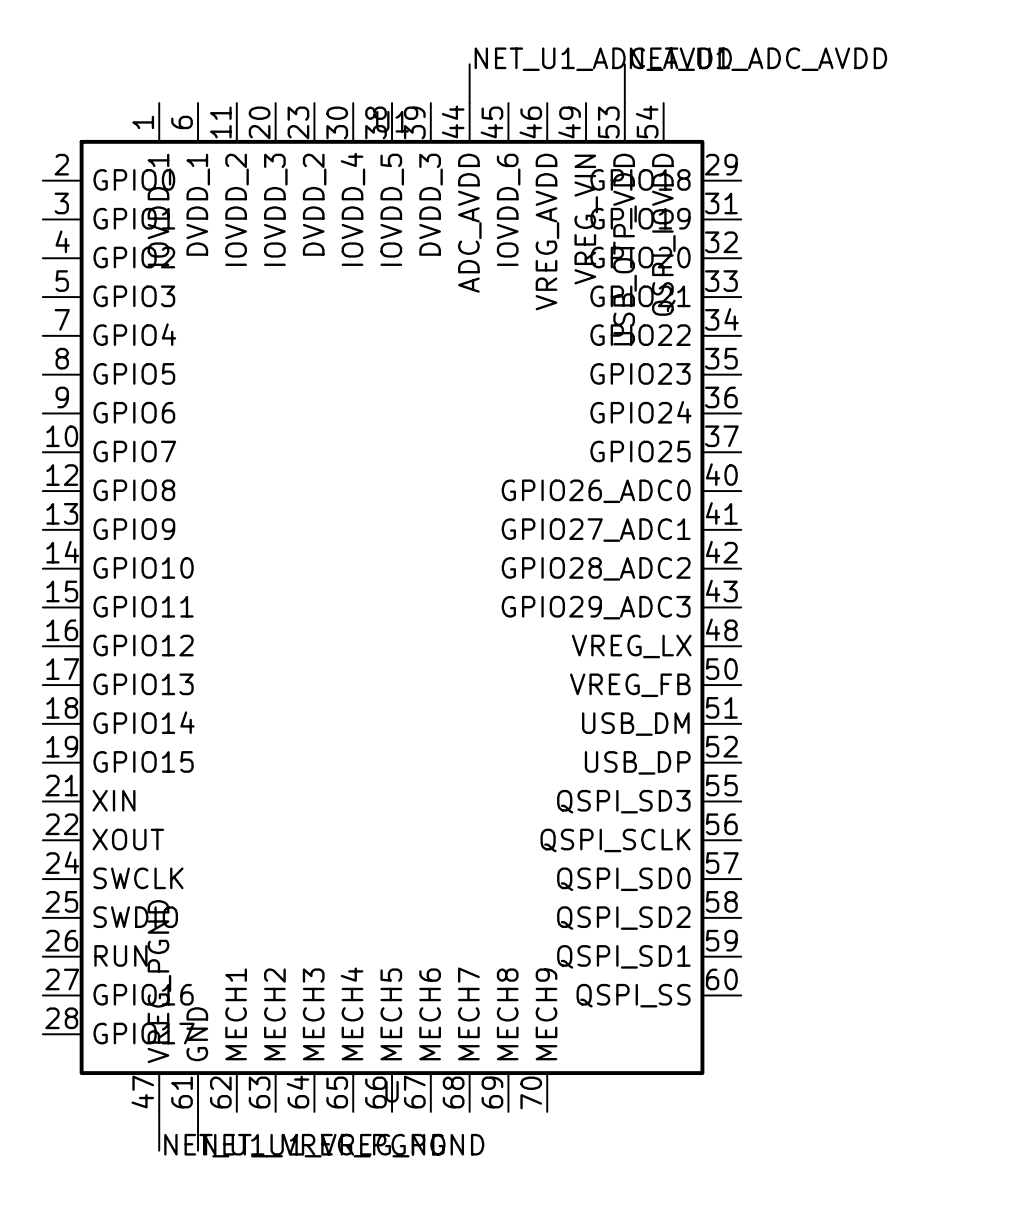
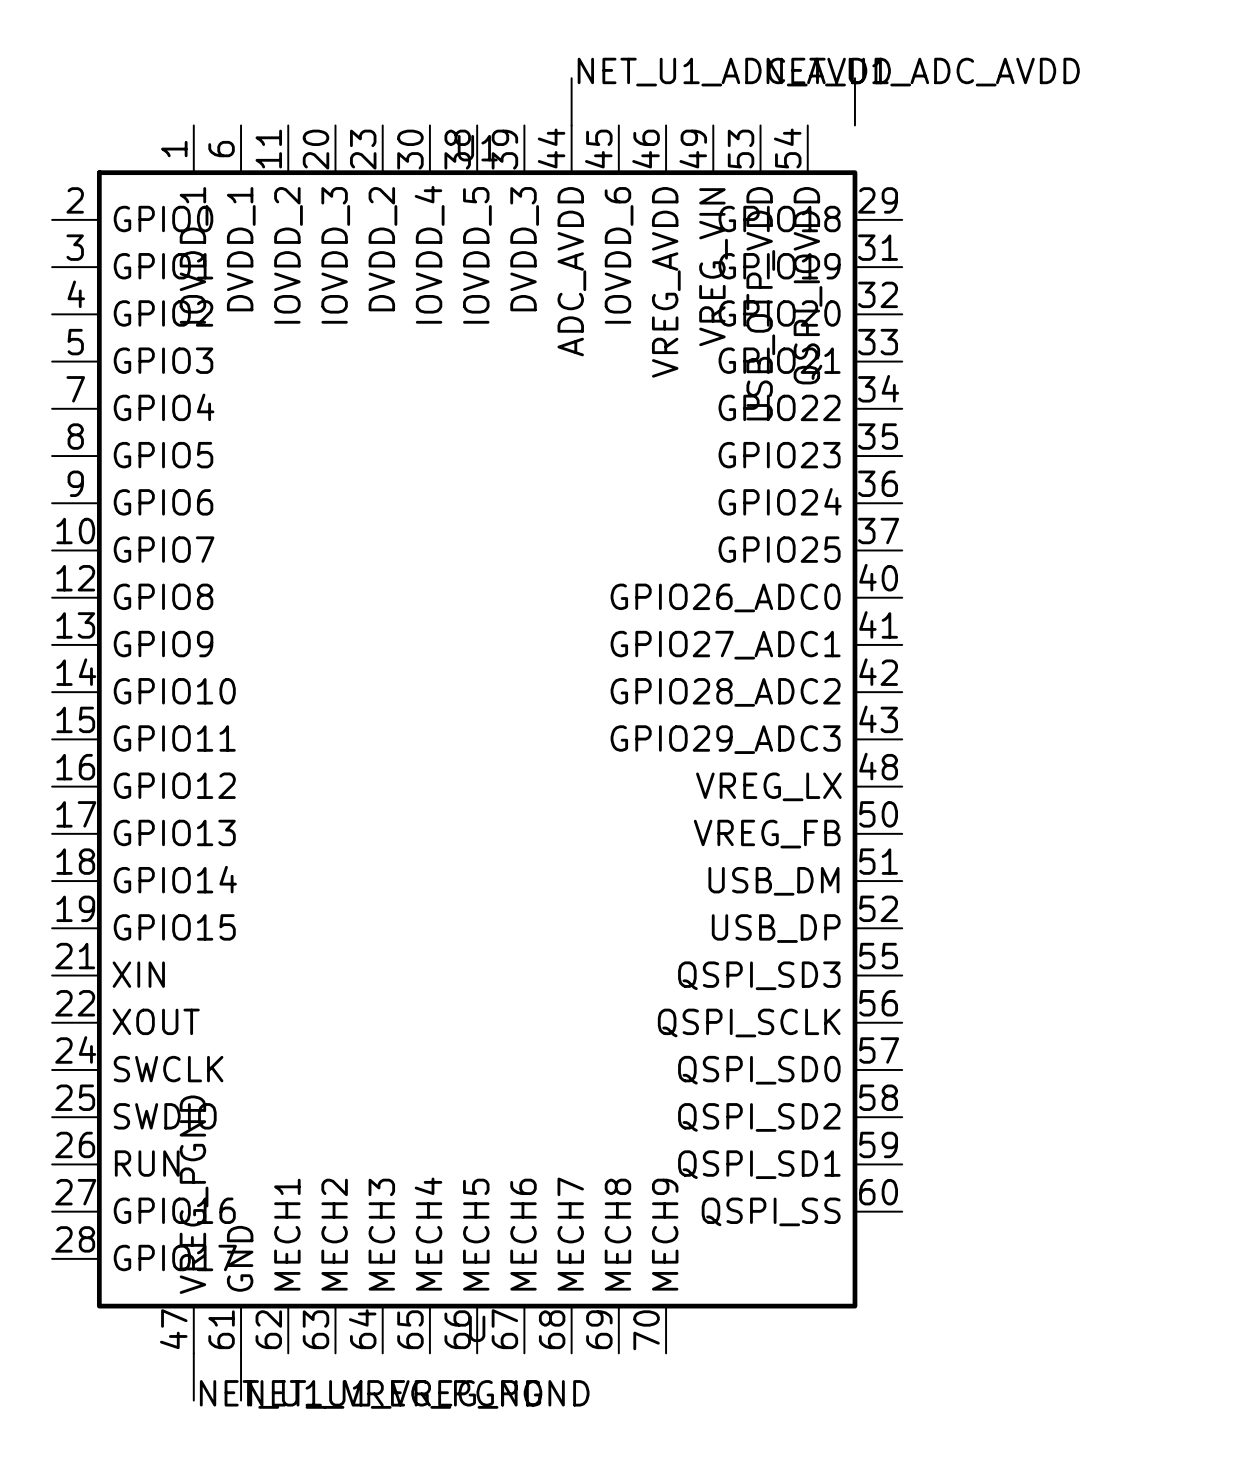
wire: (624, 64) (624, 103) -> (854, 78) (854, 125)

